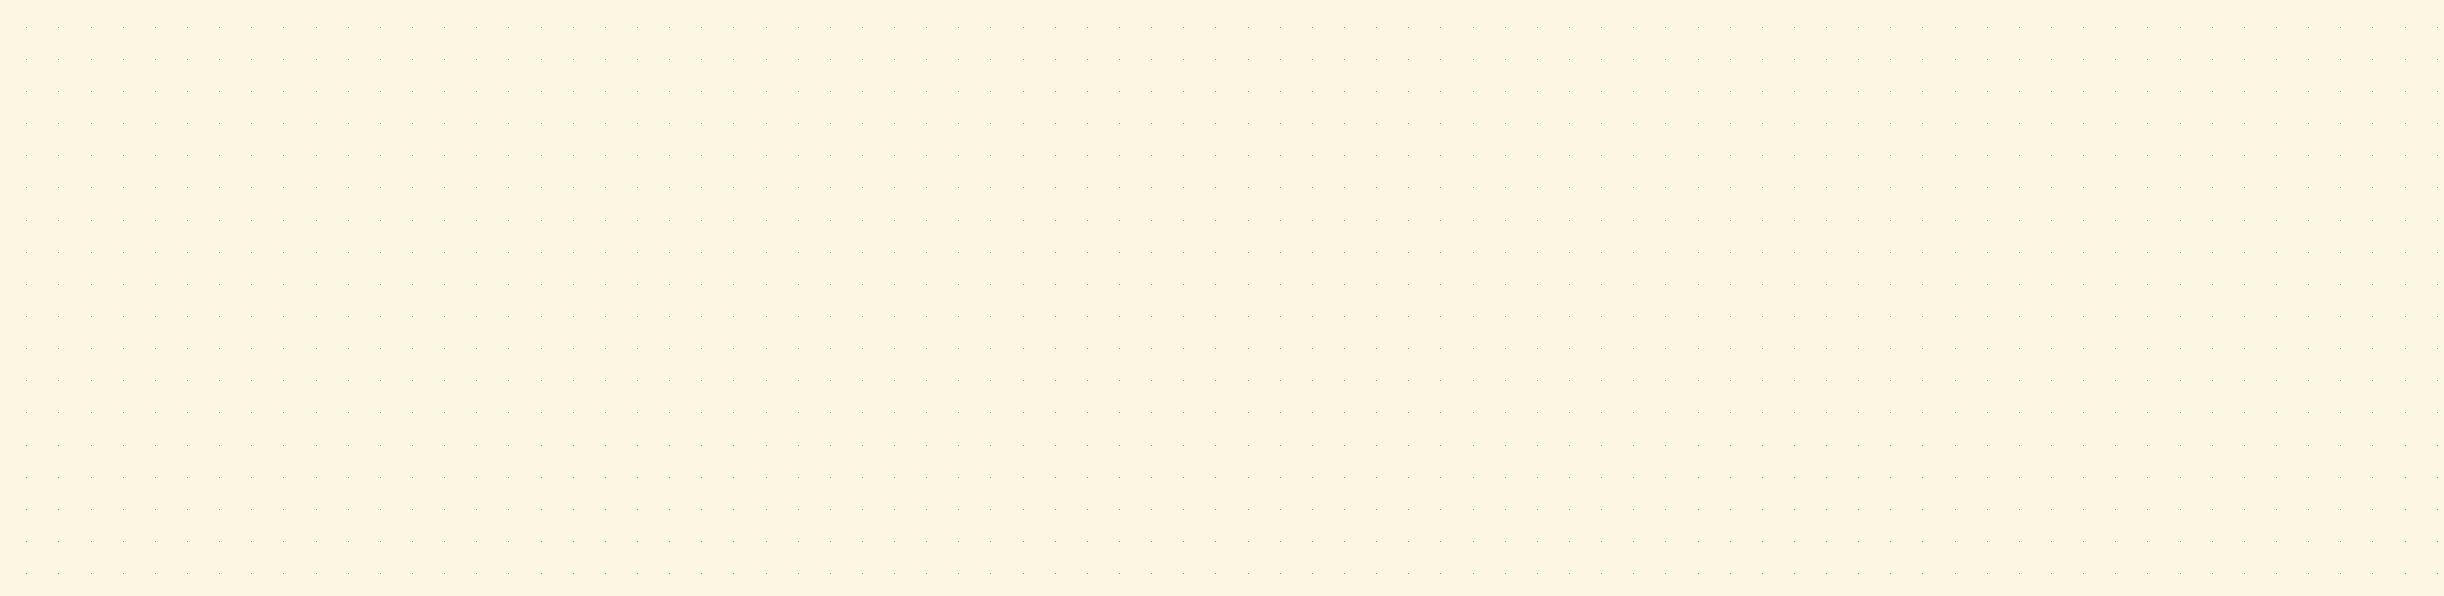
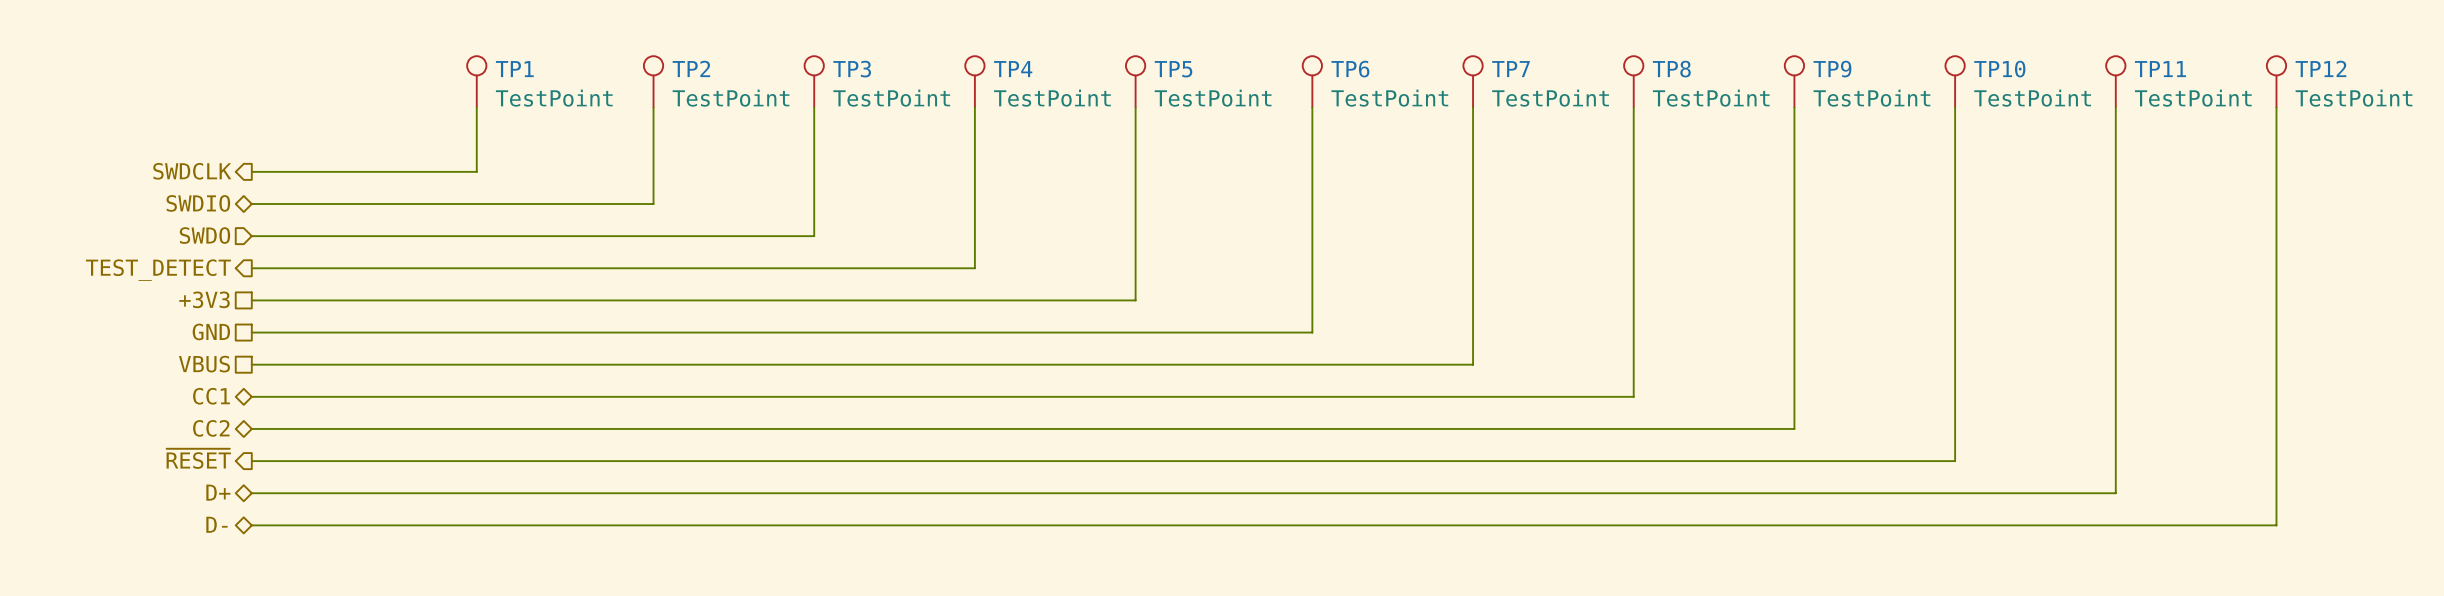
TP1: none -> TestPoint (476, 81)
TP2: none -> TestPoint (653, 81)
TP3: none -> TestPoint (814, 81)
TP4: none -> TestPoint (974, 81)
TP5: none -> TestPoint (1135, 81)
TP6: none -> TestPoint (1312, 81)
TP7: none -> TestPoint (1473, 81)
TP8: none -> TestPoint (1633, 81)
TP9: none -> TestPoint (1794, 81)
TP10: none -> TestPoint (1955, 81)
TP11: none -> TestPoint (2115, 81)
TP12: none -> TestPoint (2276, 81)
wire: none -> (476, 107) (476, 171) (251, 171)
wire: none -> (653, 107) (653, 204) (251, 204)
wire: none -> (814, 107) (814, 236) (251, 236)
wire: none -> (974, 107) (974, 268) (251, 268)
wire: none -> (1135, 107) (1135, 300) (251, 300)
wire: none -> (1312, 107) (1312, 332) (251, 332)
wire: none -> (1473, 107) (1473, 364) (251, 364)
wire: none -> (1633, 107) (1633, 396) (251, 396)
wire: none -> (1794, 107) (1794, 428) (251, 428)
wire: none -> (1955, 107) (1955, 461) (251, 461)
wire: none -> (2115, 107) (2115, 493) (251, 493)
wire: none -> (2276, 107) (2276, 525) (251, 525)
hierarchical label: none -> SWDCLK (192, 171)
hierarchical label: none -> SWDIO (198, 203)
hierarchical label: none -> SWDO (204, 235)
hierarchical label: none -> TEST_DETECT (158, 270)
hierarchical label: none -> +3V3 (204, 299)
hierarchical label: none -> GND (211, 331)
hierarchical label: none -> VBUS (204, 364)
hierarchical label: none -> CC1 (211, 396)
hierarchical label: none -> CC2 (211, 428)
hierarchical label: none -> ~{RESET} (198, 458)
hierarchical label: none -> D+ (218, 492)
hierarchical label: none -> D- (216, 524)

